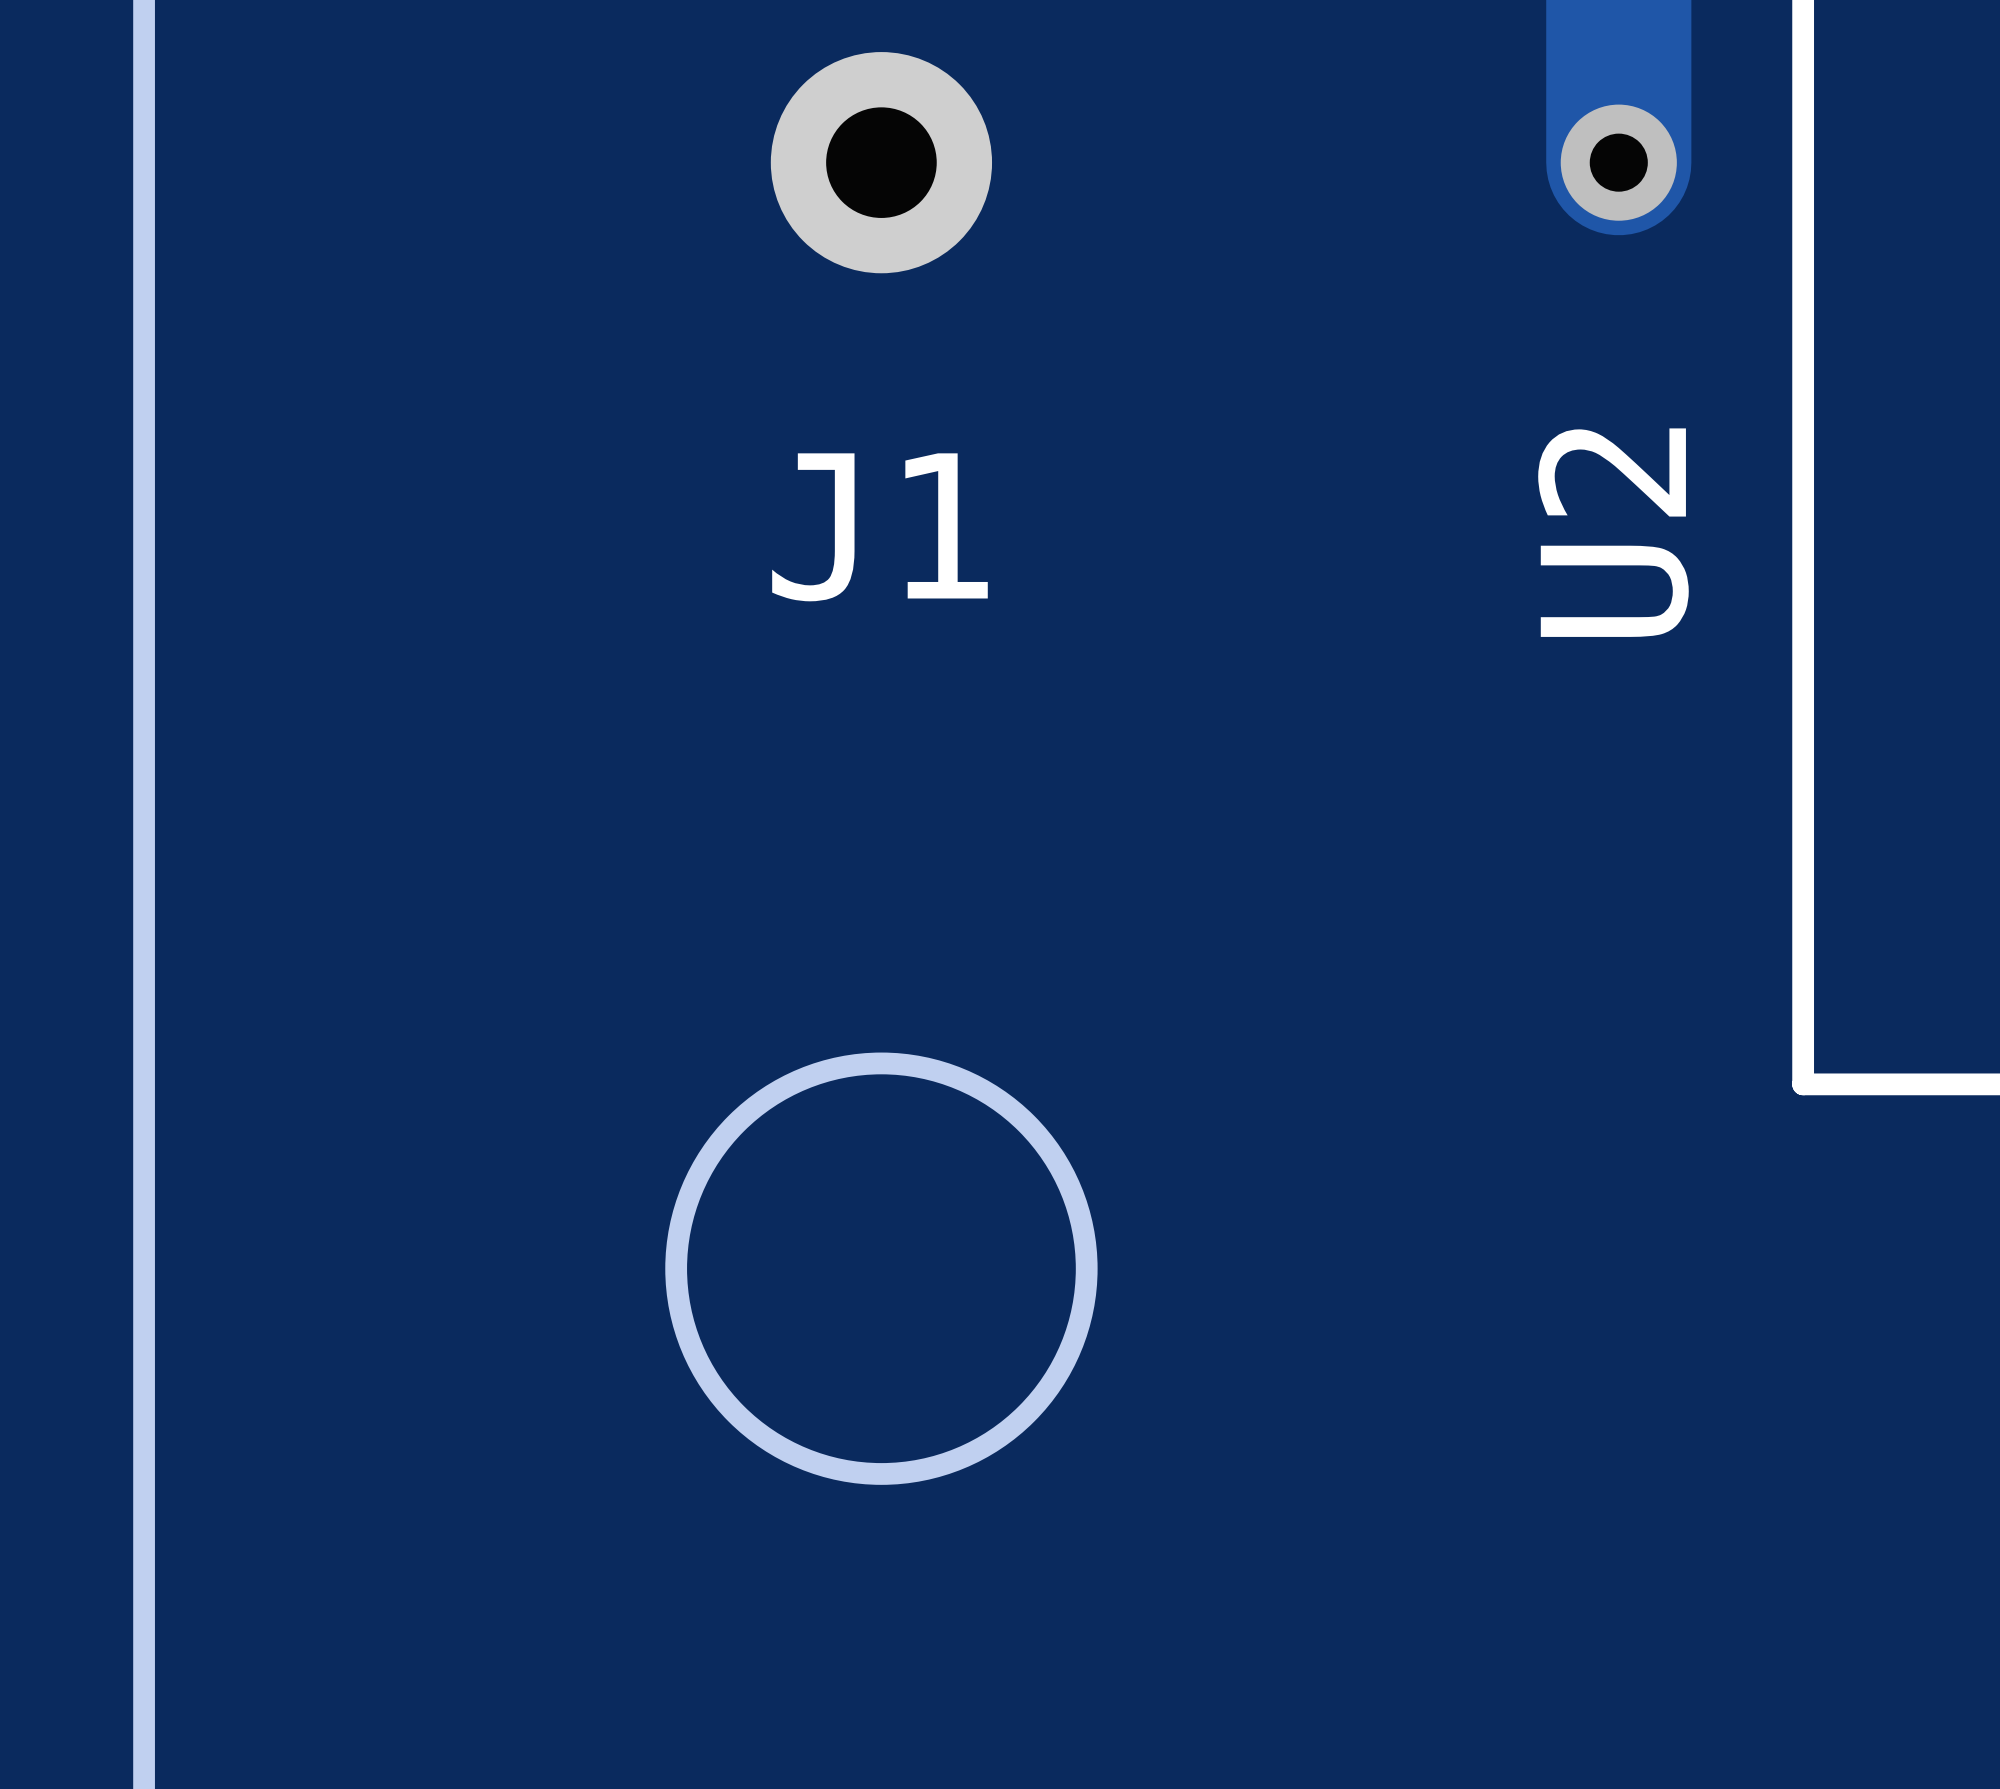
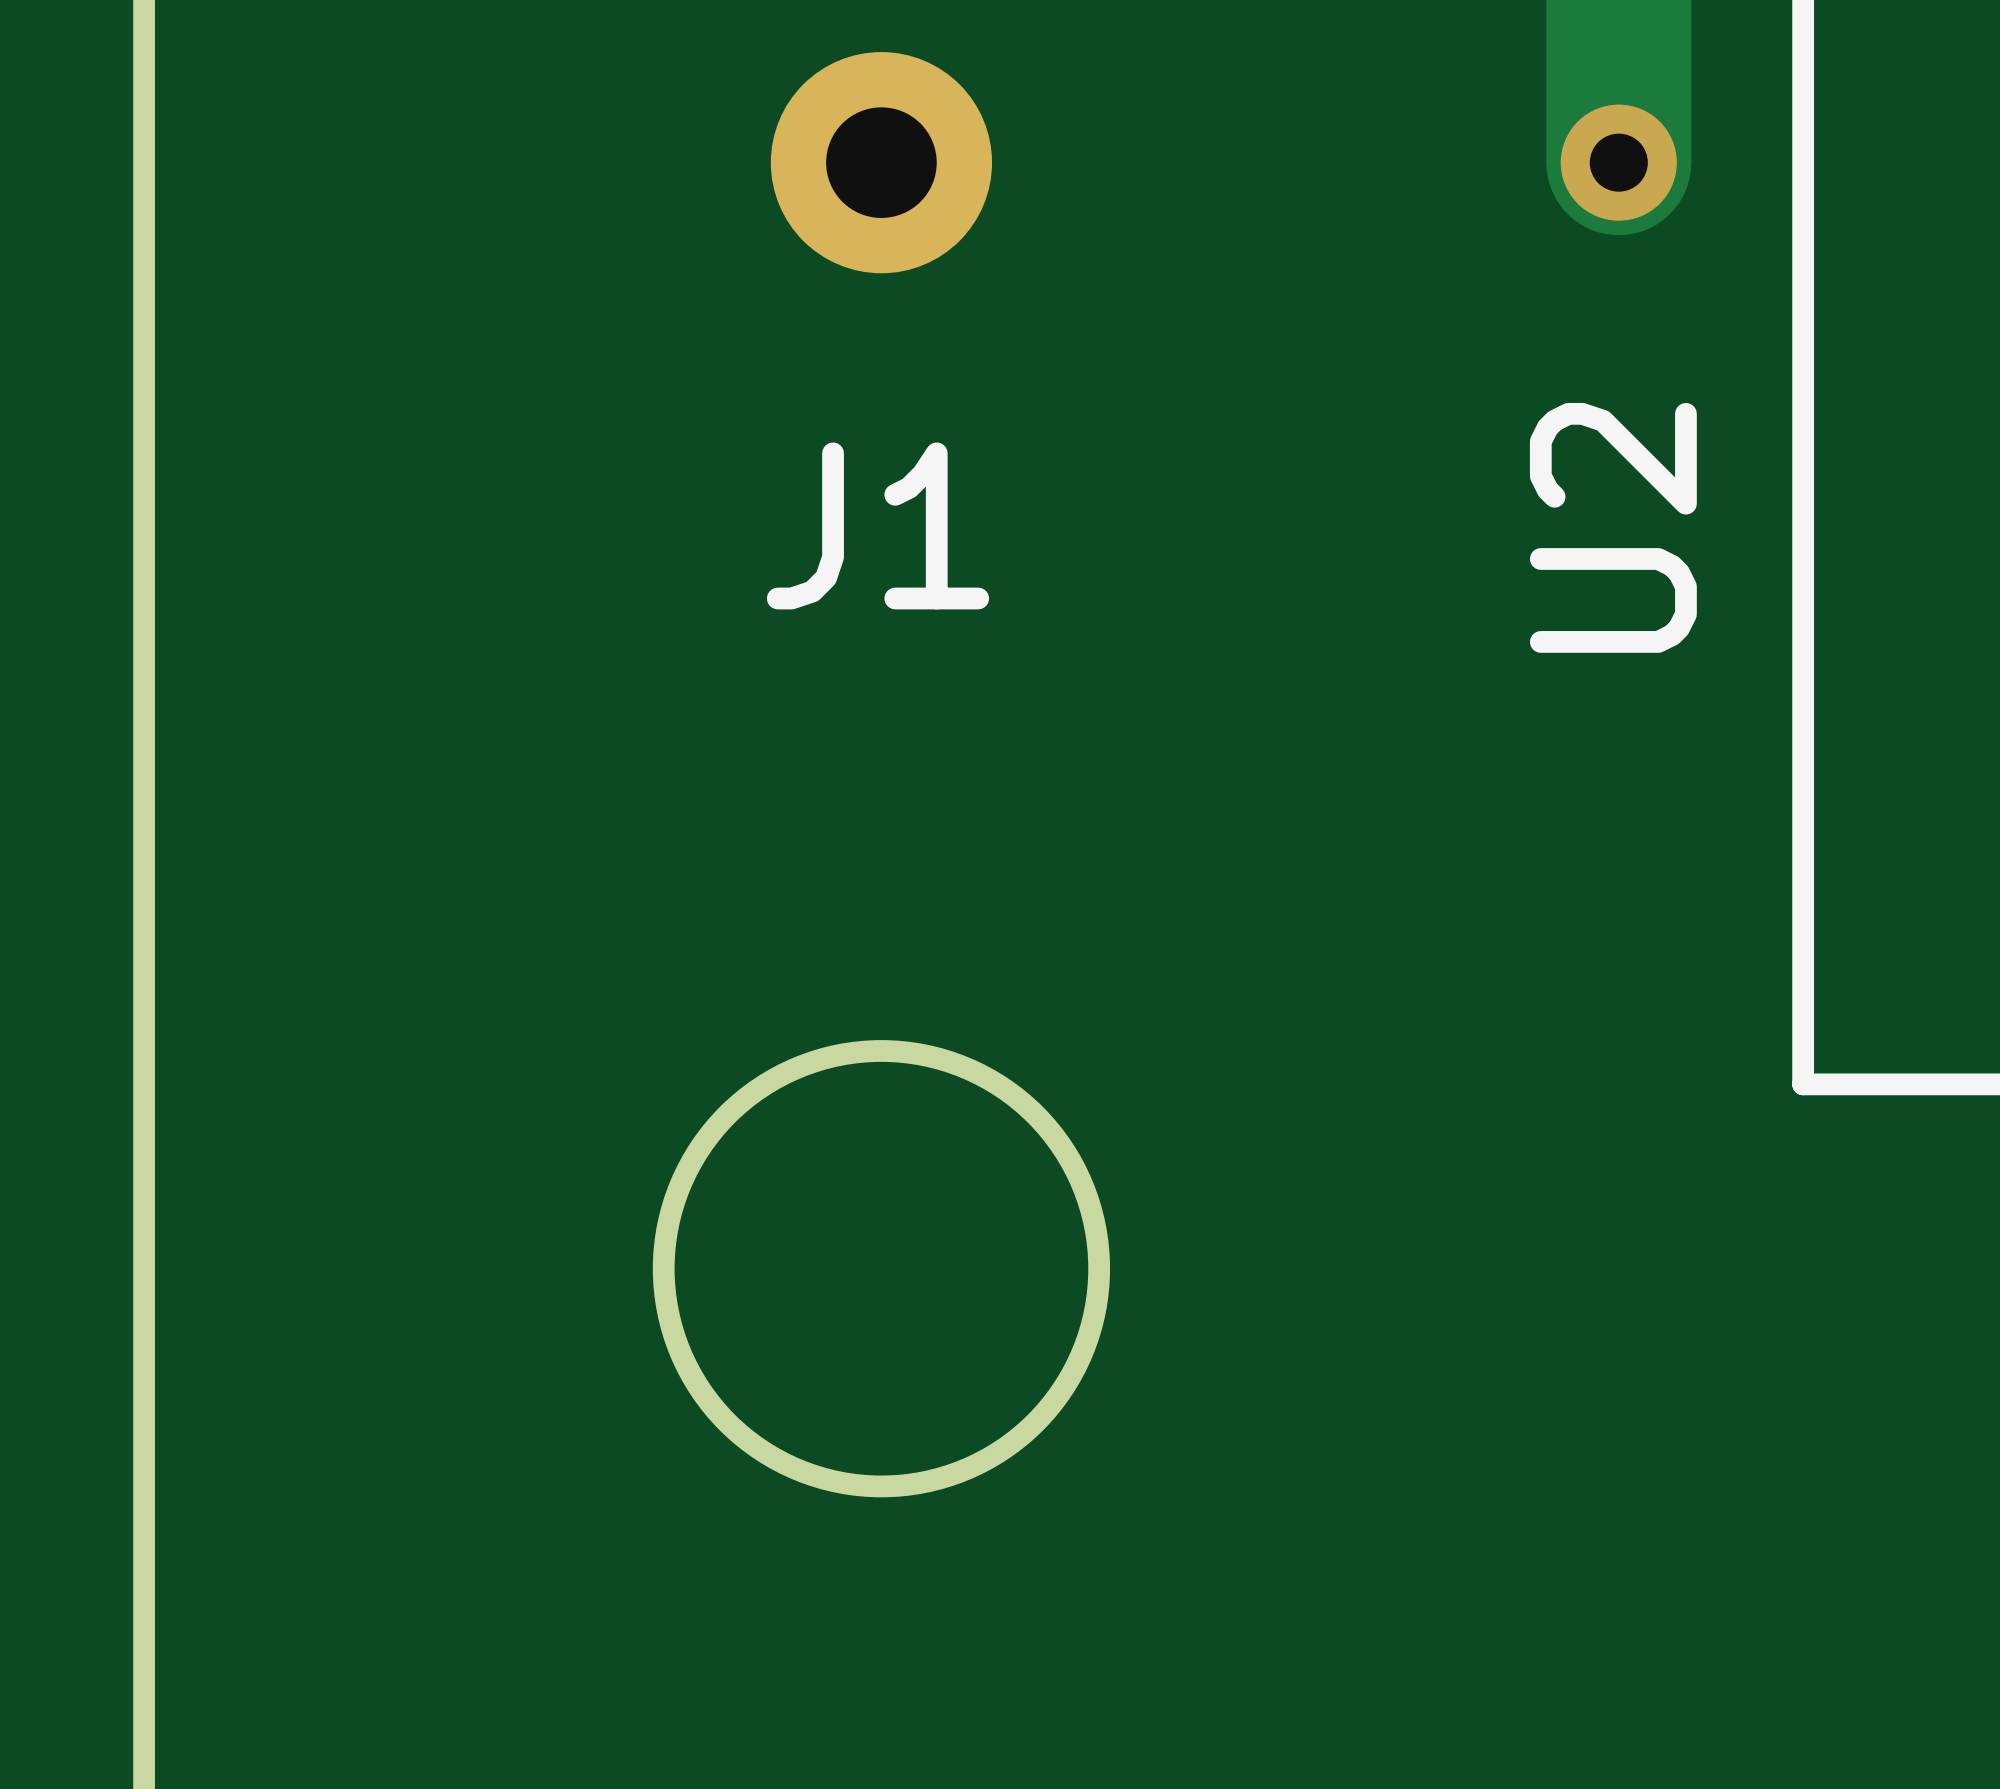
round board edge size: [665, 1052, 1098, 1485] -> [652, 1040, 1111, 1498]

